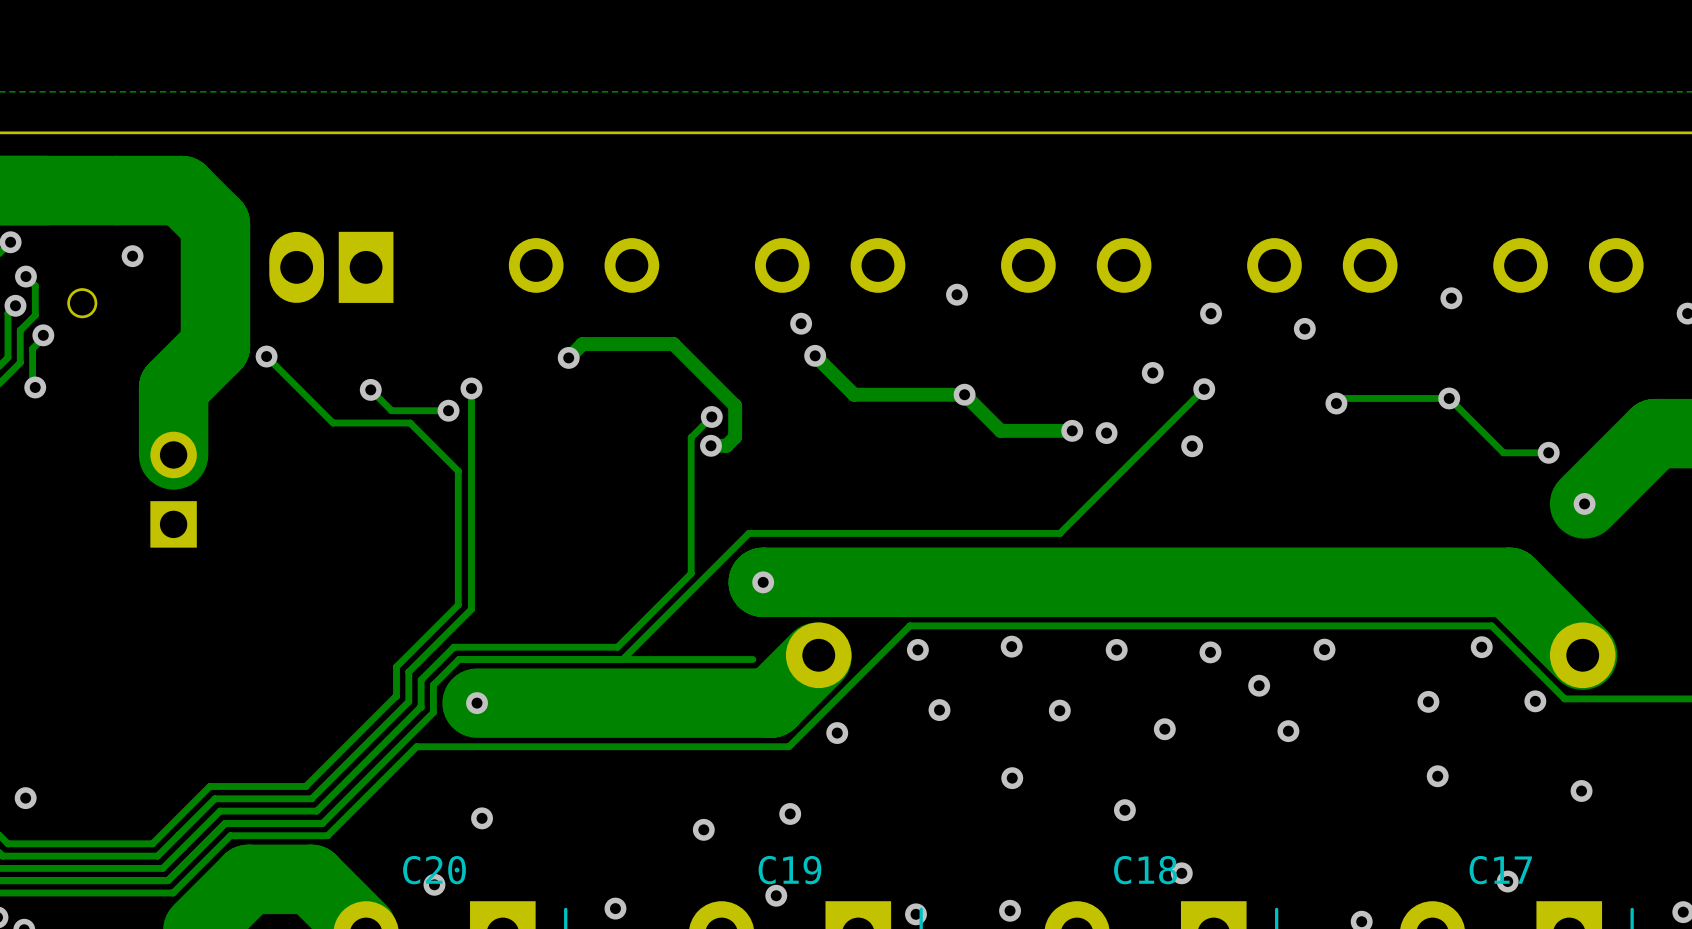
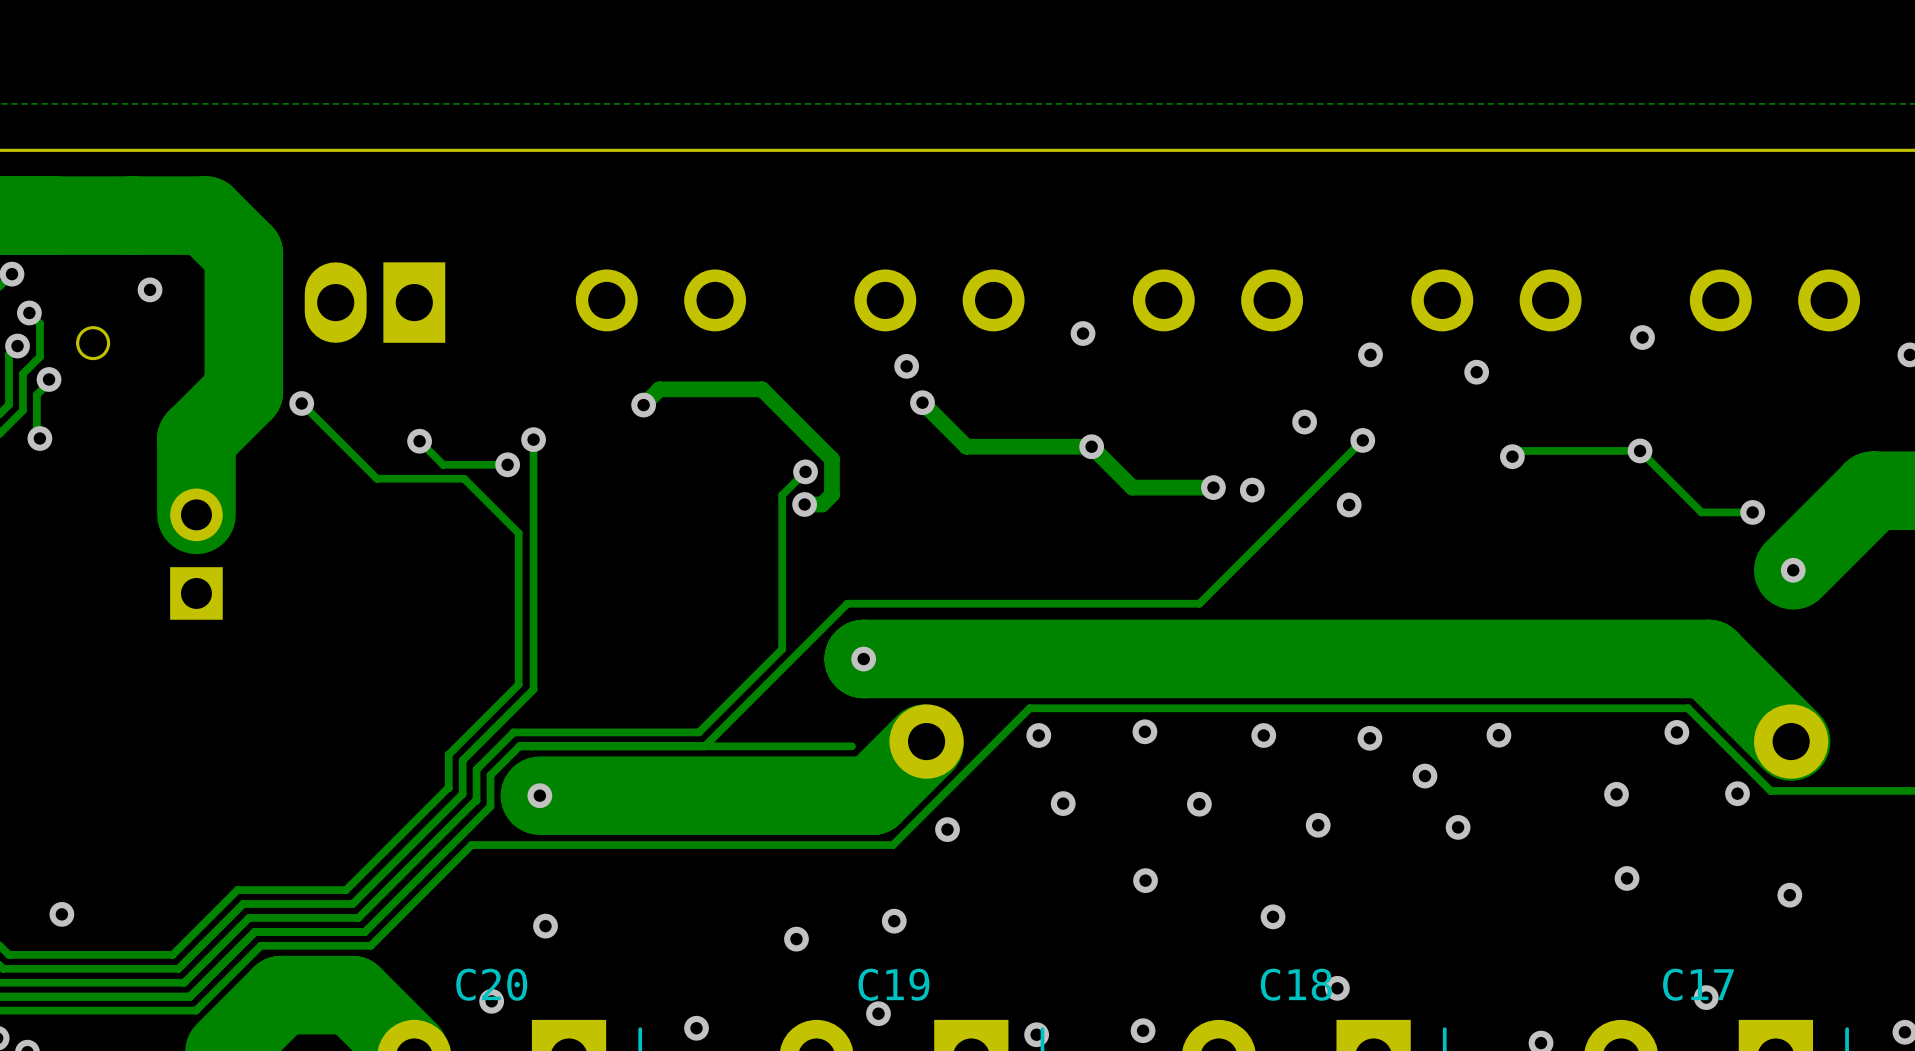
via: (25, 798) -> none
via: none -> (61, 914)

